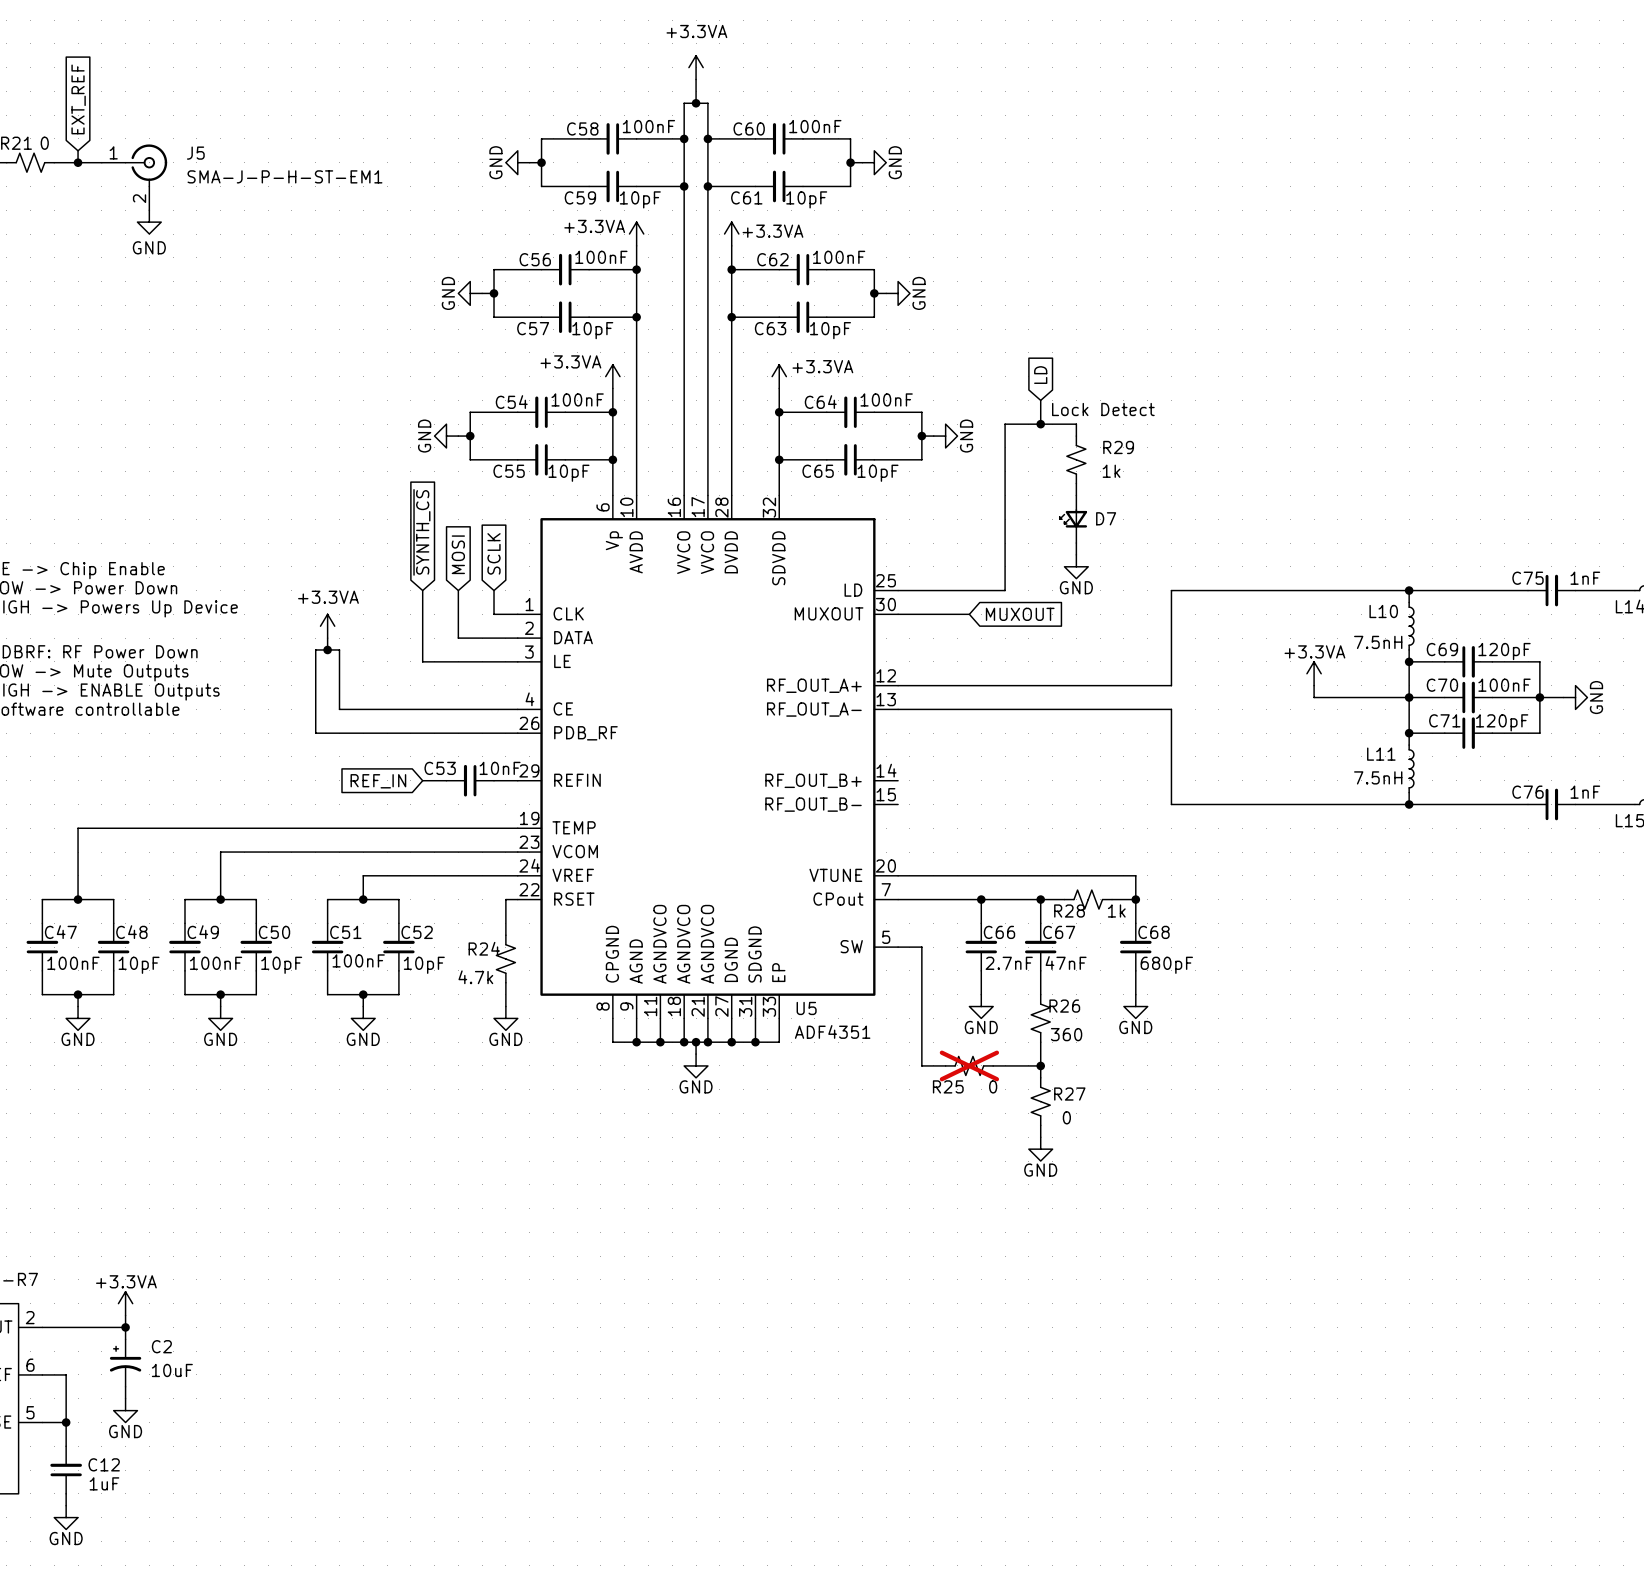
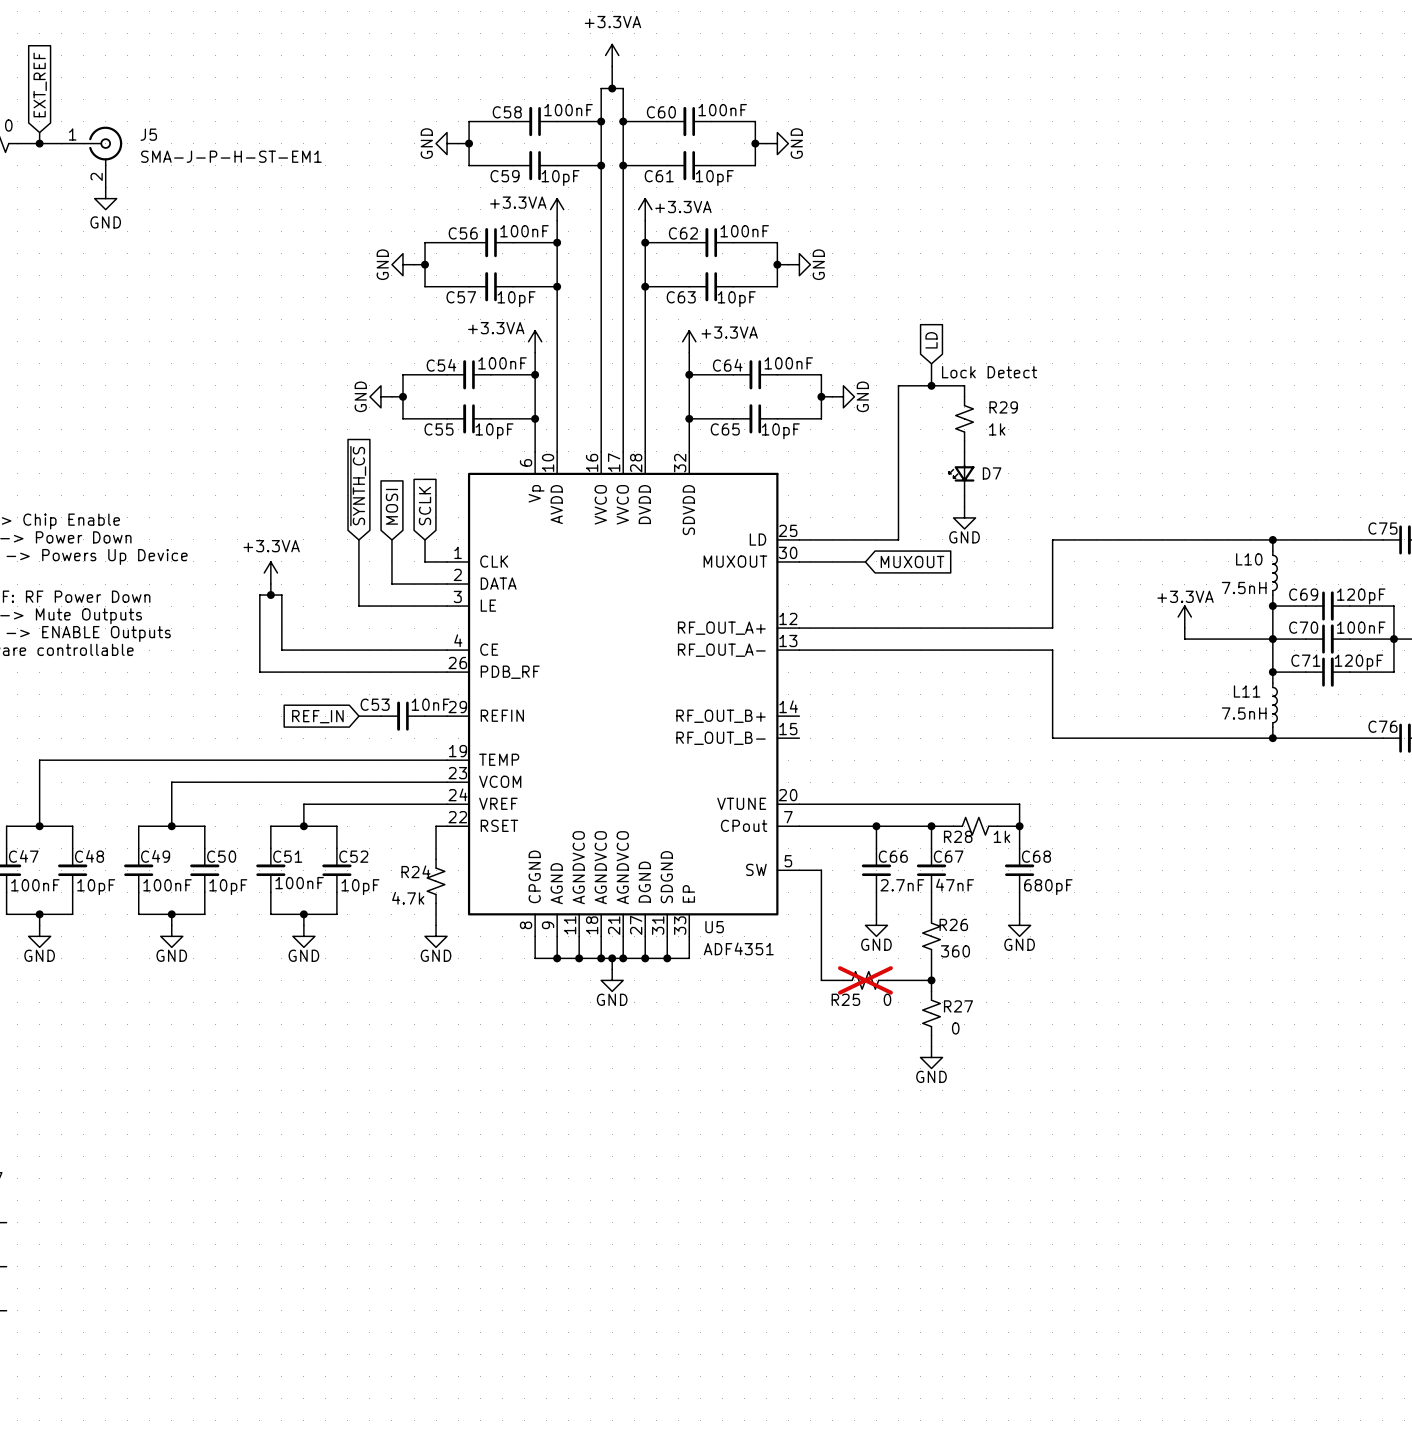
power symbol: +3.3VA (125, 1303) -> none
wire: (125, 1315) (125, 1339) -> none
wire: (42, 1327) (125, 1327) -> none
junction: (125, 1327) -> none
C2: 10uF (125, 1363) -> none
wire: (42, 1374) (66, 1374) (66, 1446) -> none
wire: (125, 1386) (125, 1398) -> none
power symbol: GND (125, 1410) -> none
wire: (42, 1422) (66, 1422) -> none
junction: (66, 1422) -> none
C12: 1uF (66, 1470) -> none
wire: (66, 1493) (66, 1505) -> none
power symbol: GND (66, 1517) -> none

